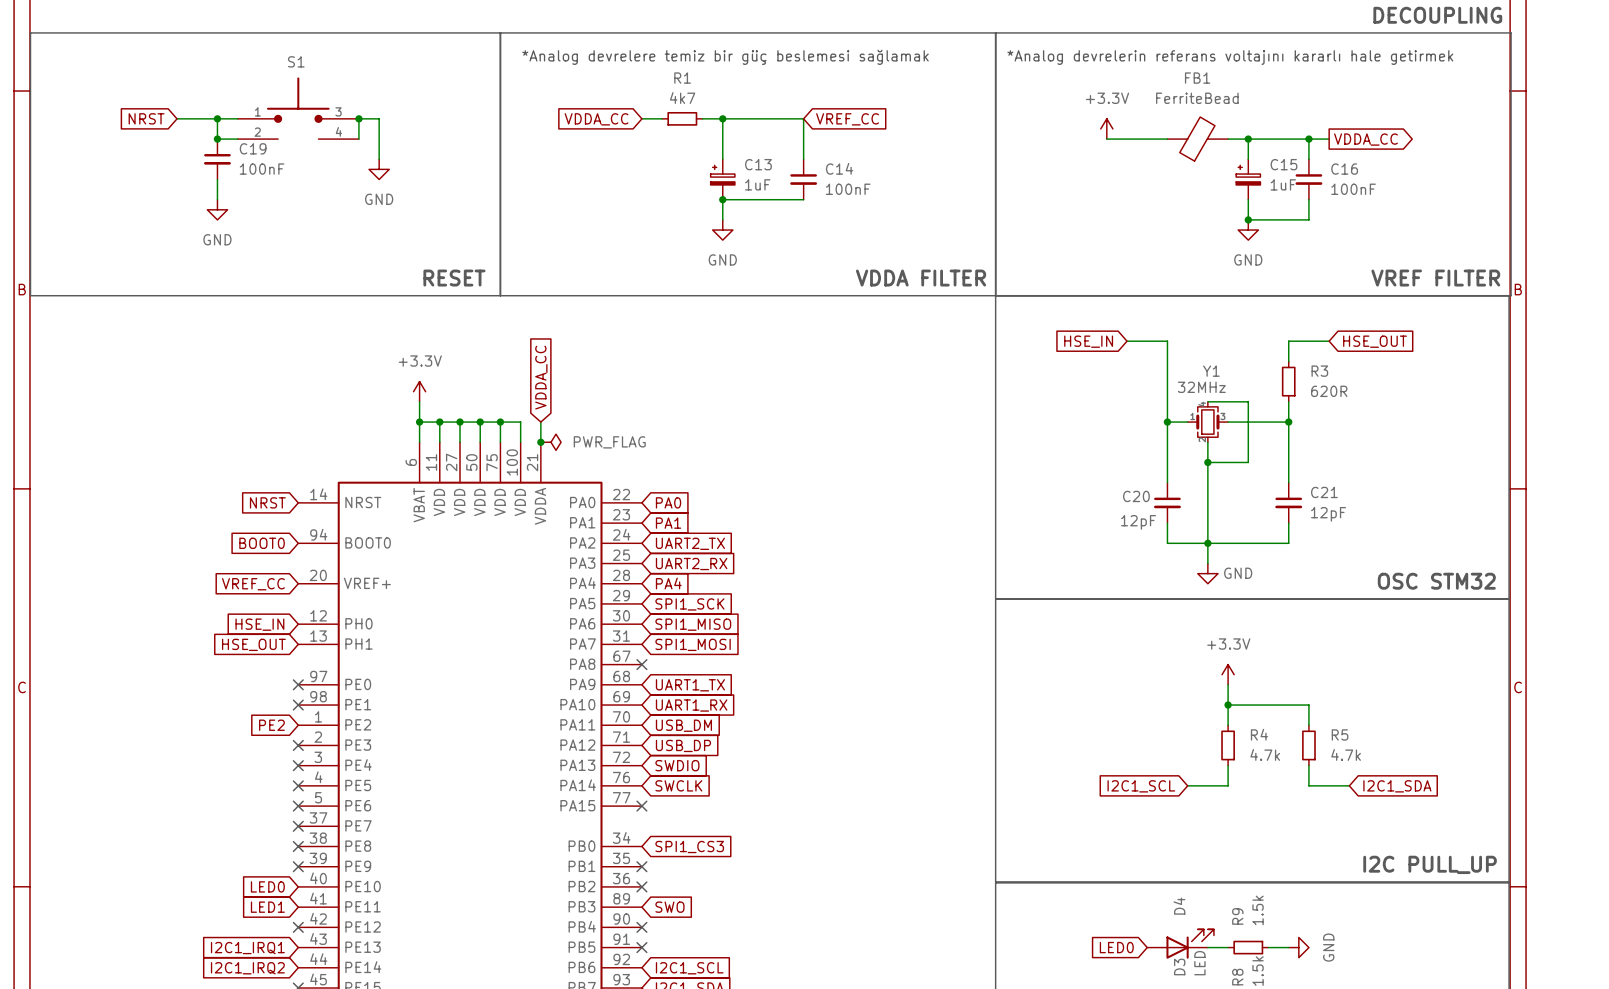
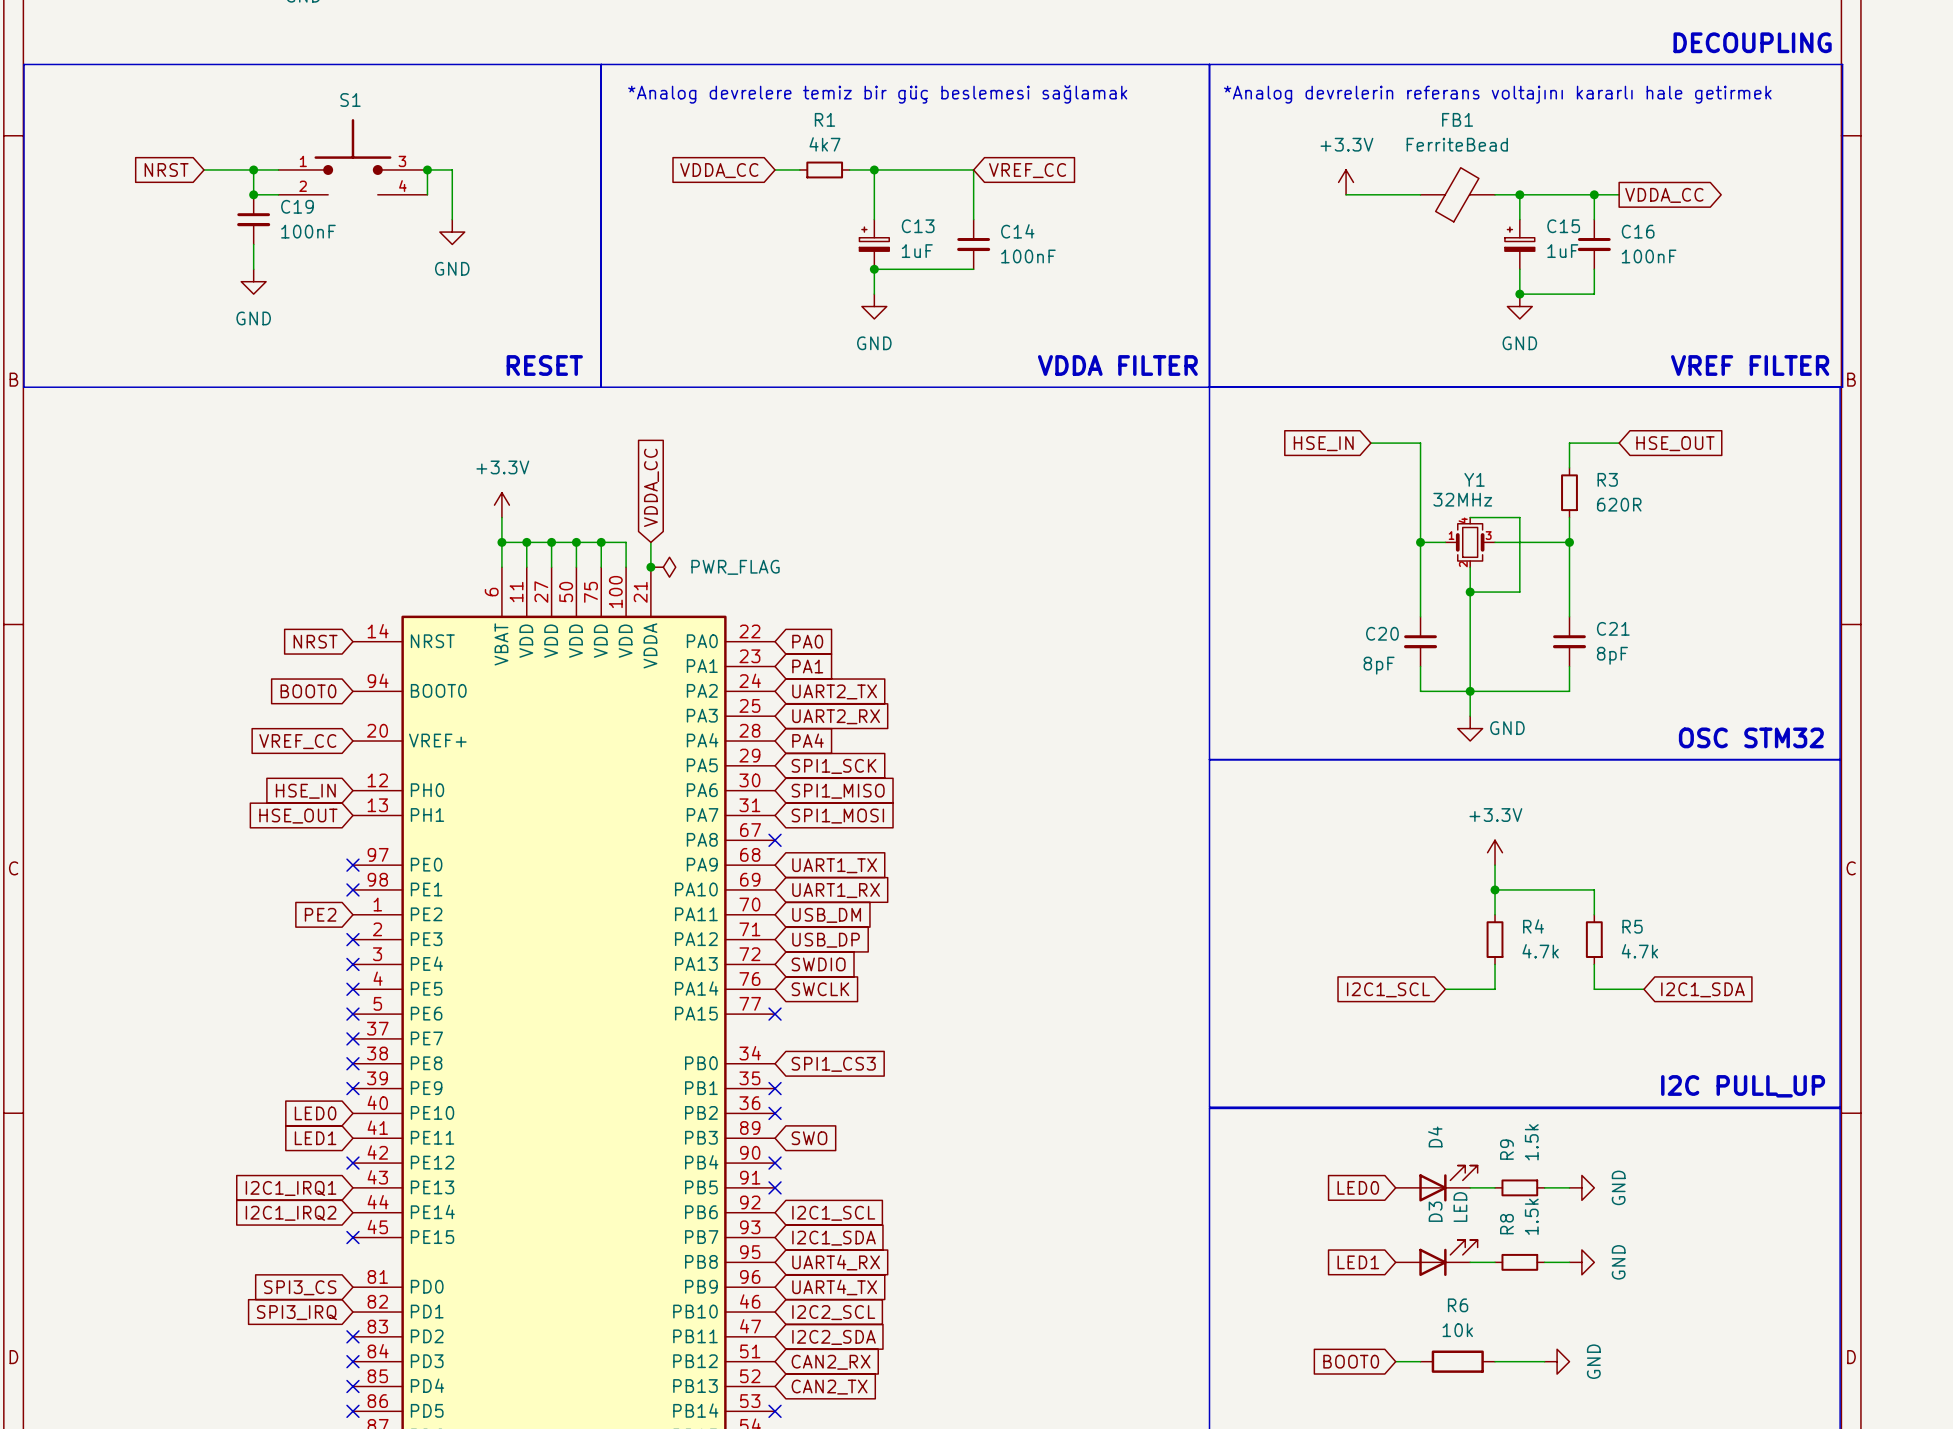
C21 value: 12pF (1328, 514) -> 8pF (1612, 655)
C20 value: 12pF (1138, 522) -> 8pF (1379, 665)

